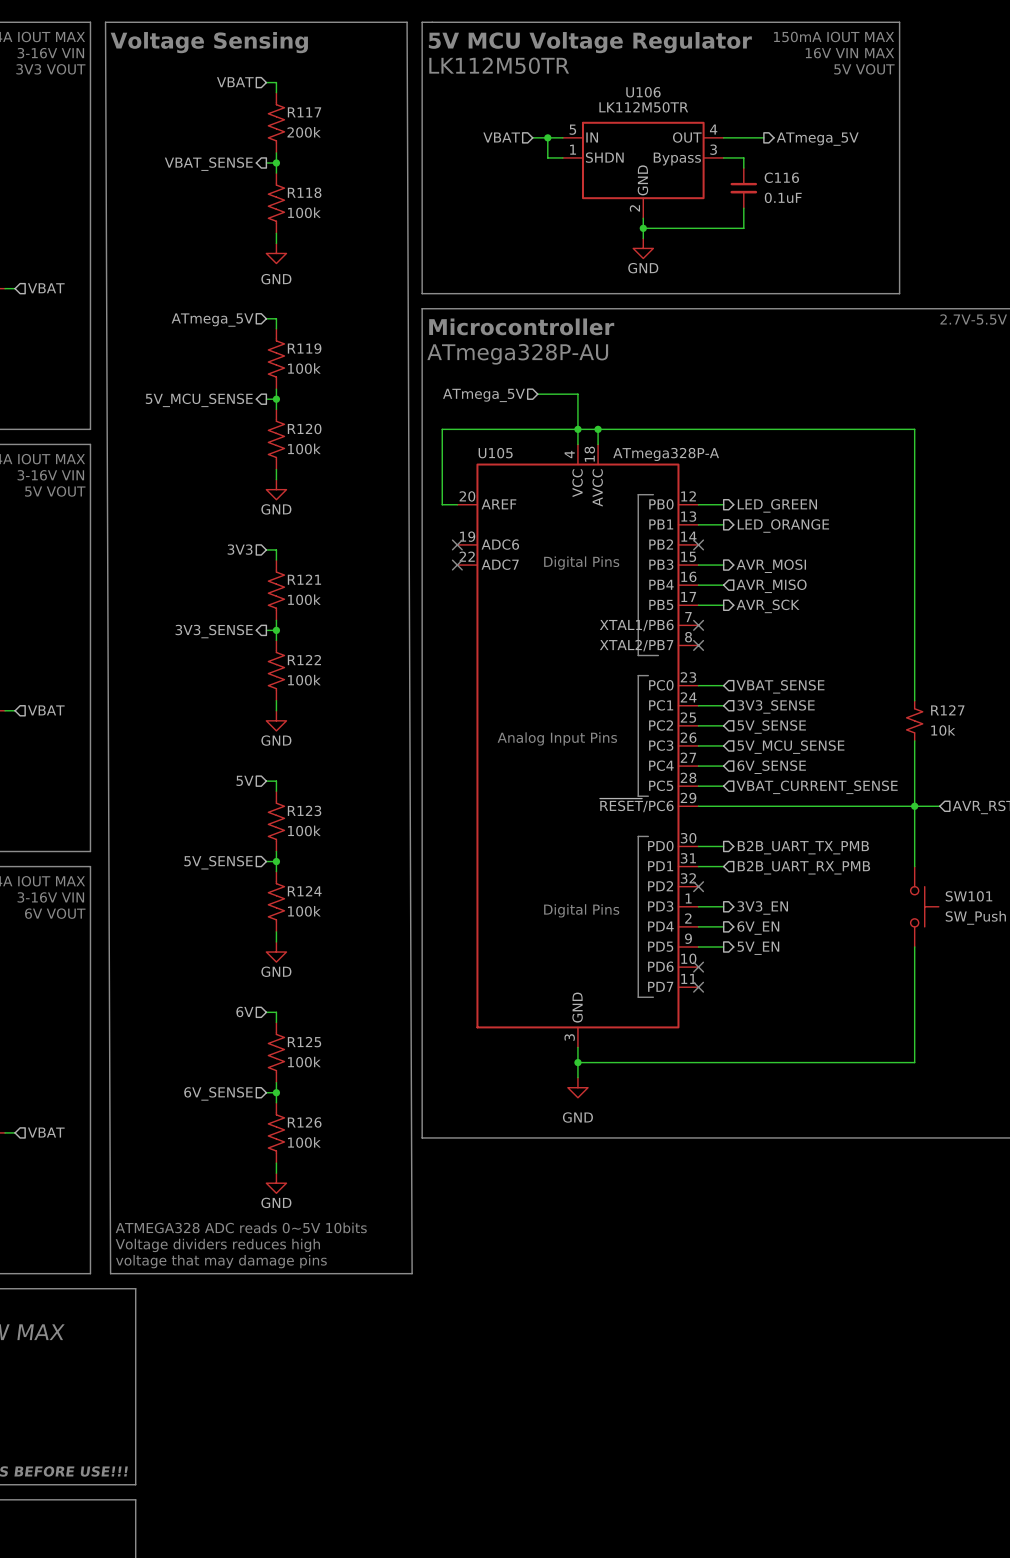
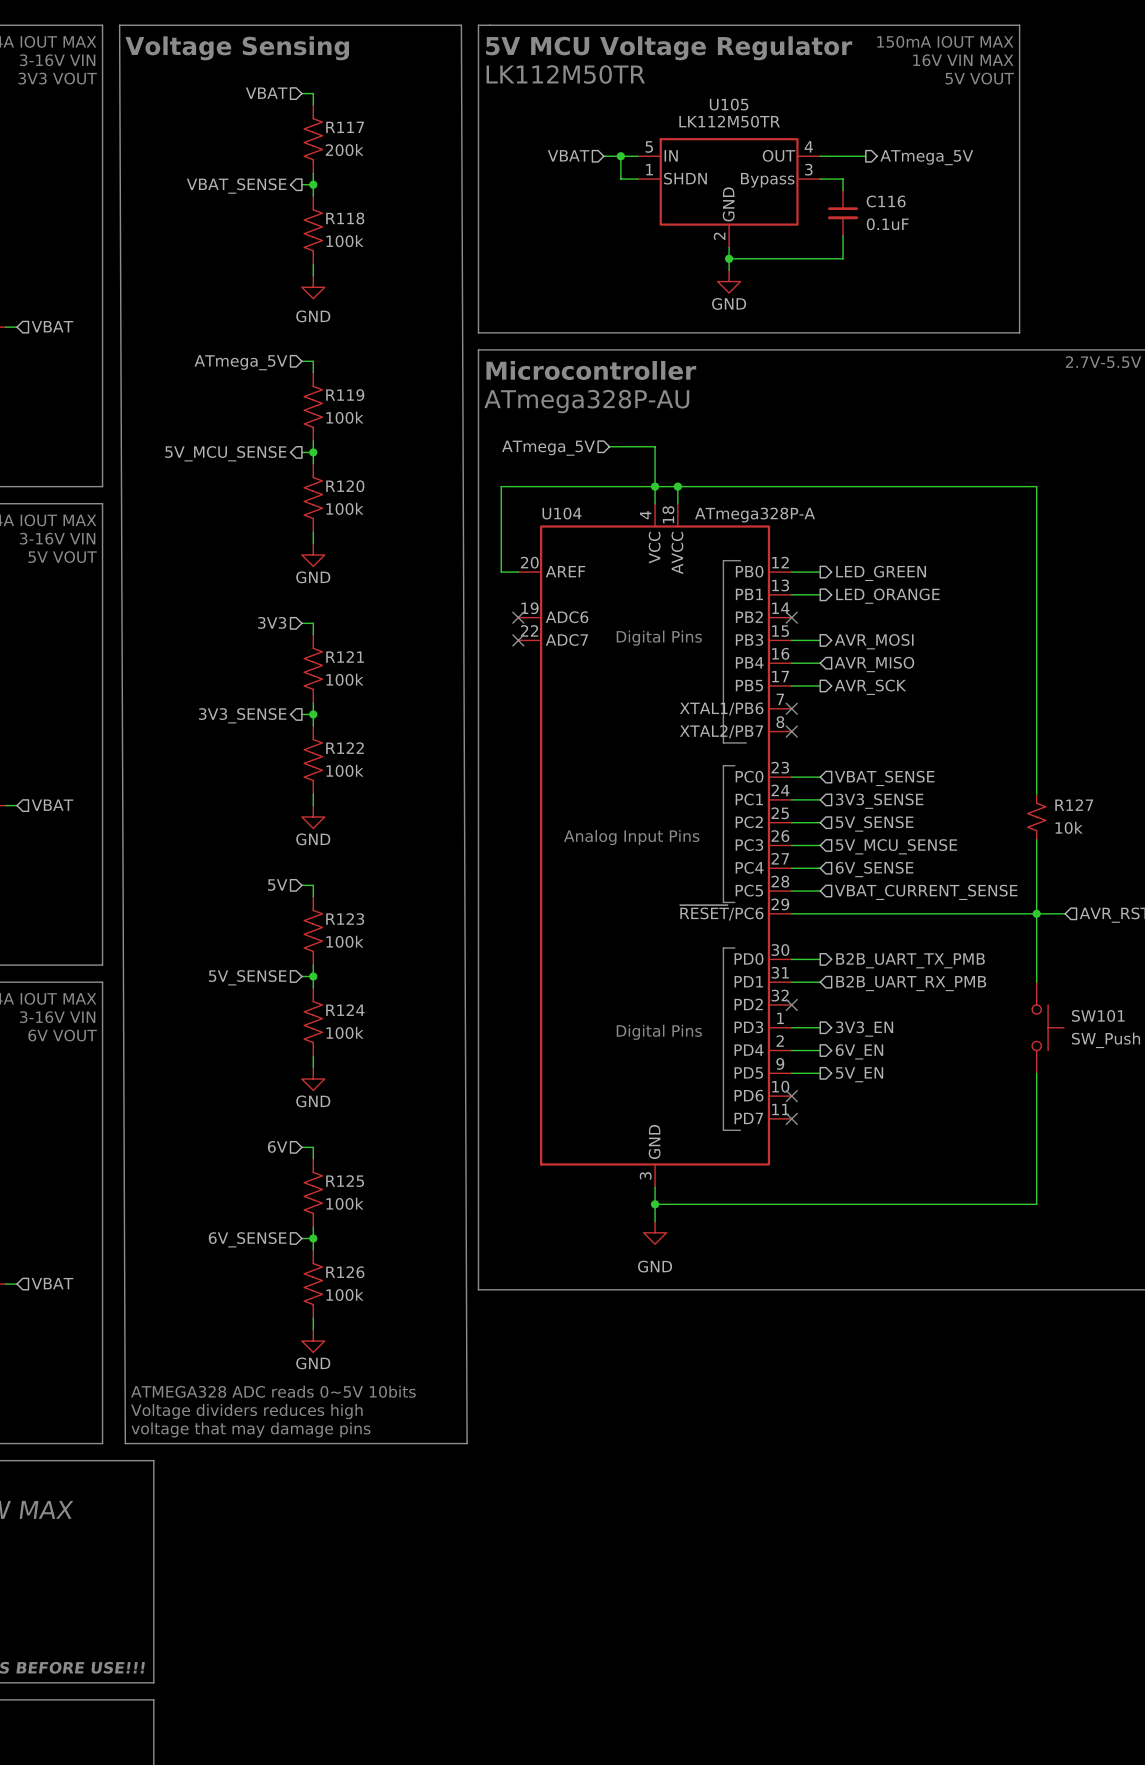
U106 name: U106 (643, 92) -> U105 (729, 104)
U105 name: U105 (495, 453) -> U104 (562, 513)

